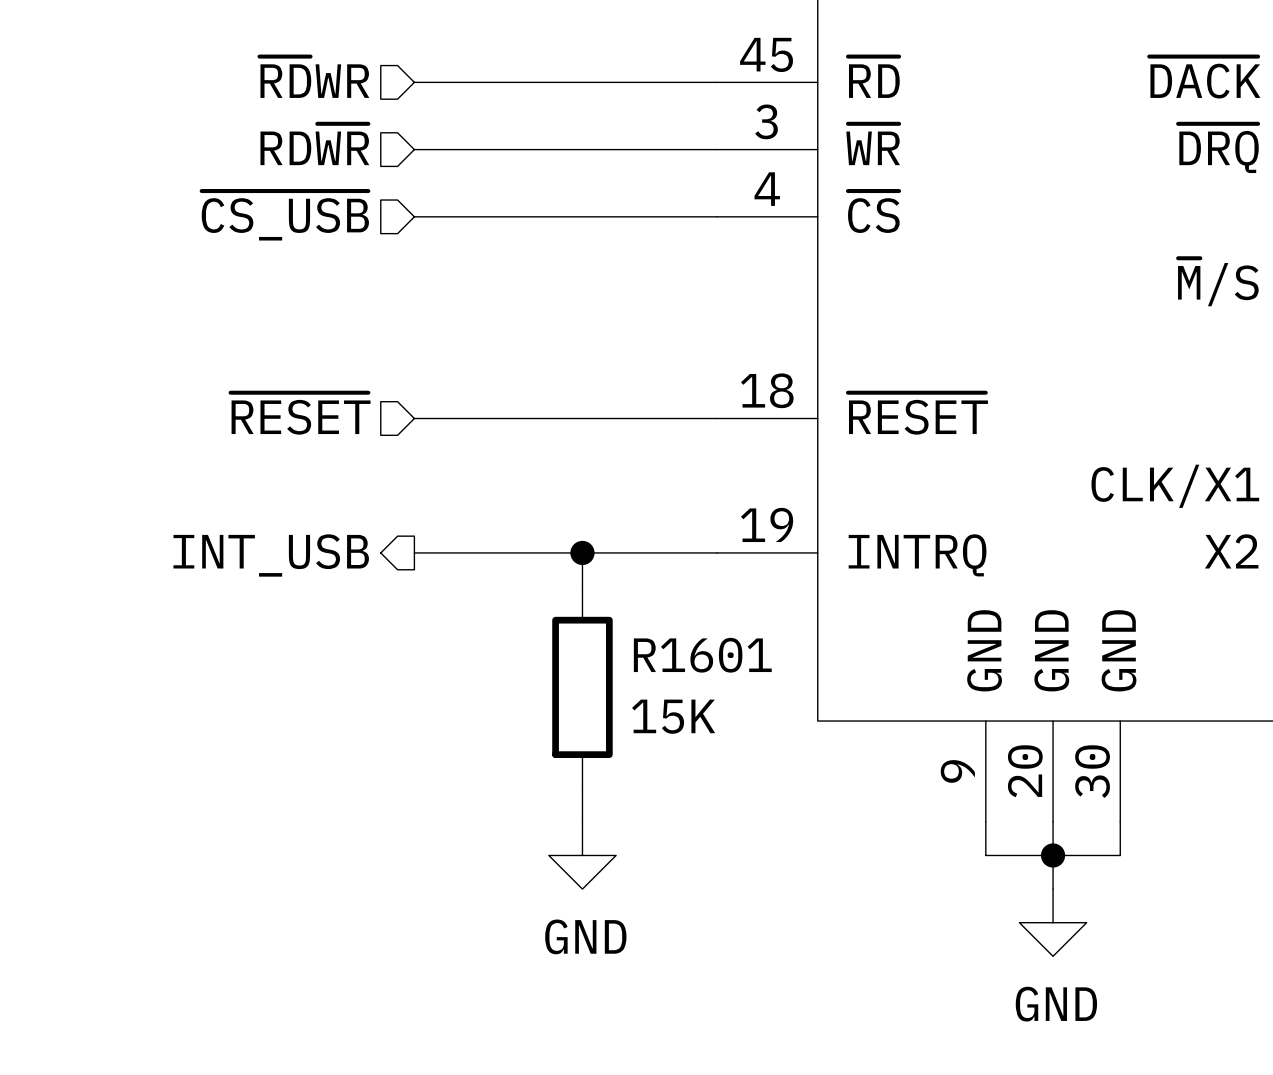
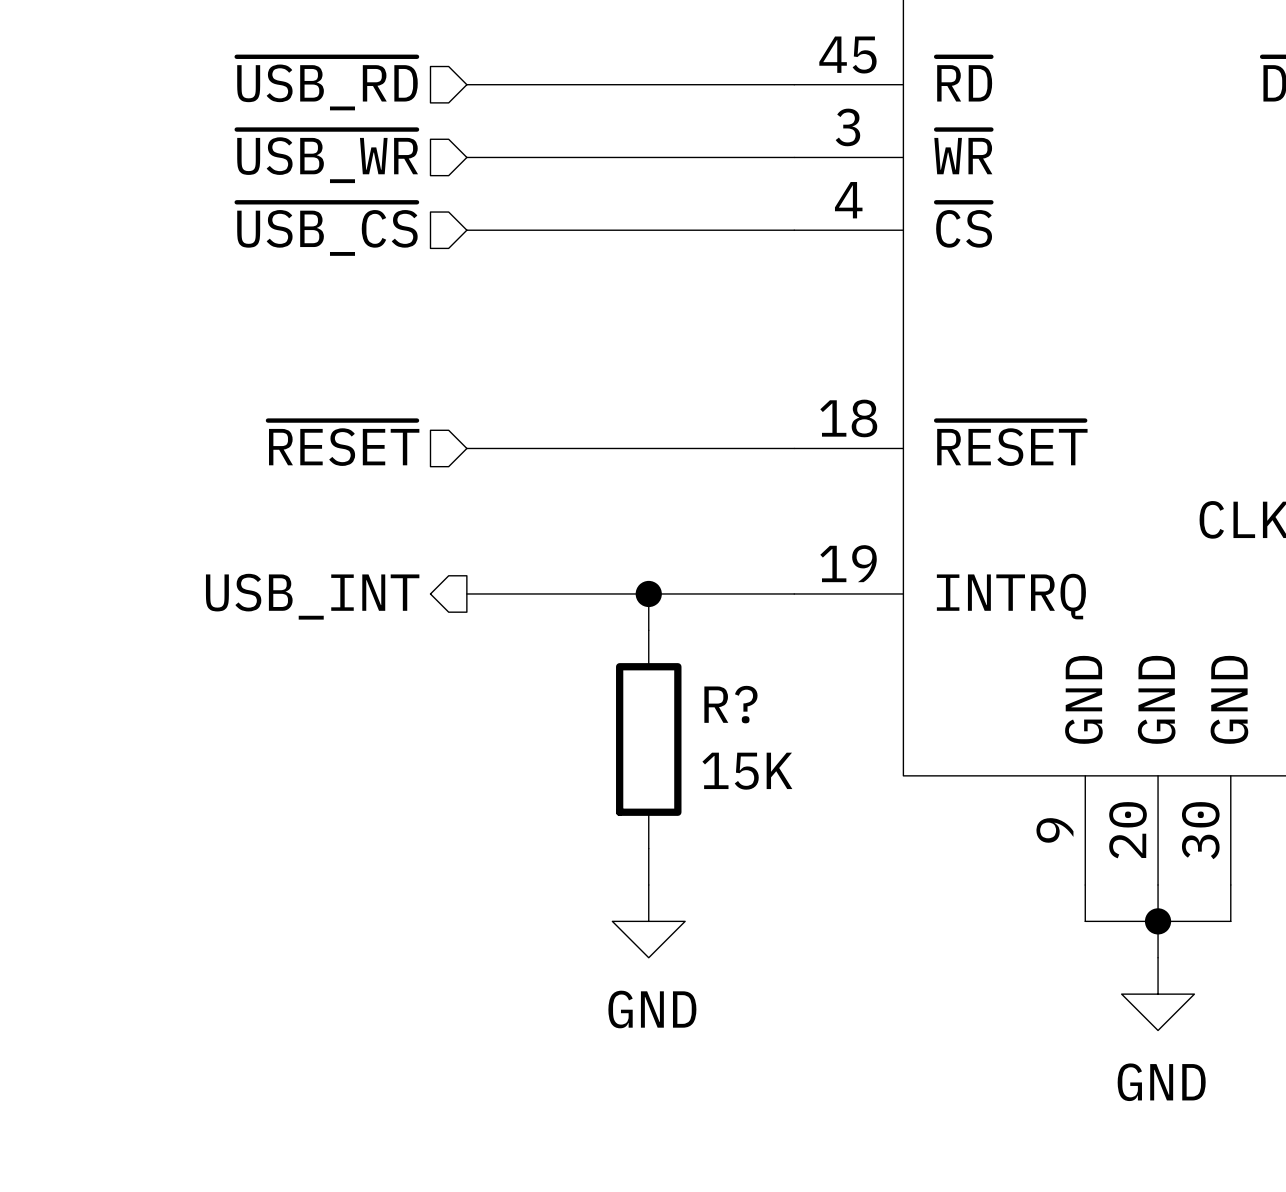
hierarchical label: ~{RD}WR (314, 77) -> ~{USB_RD} (327, 83)
hierarchical label: RD~{WR} (314, 144) -> ~{USB_WR} (327, 156)
hierarchical label: ~{CS_USB} (285, 215) -> ~{USB_CS} (327, 229)
hierarchical label: INT_USB (271, 555) -> USB_INT (312, 596)
R1601 name: R1601 (702, 655) -> R? (730, 704)

